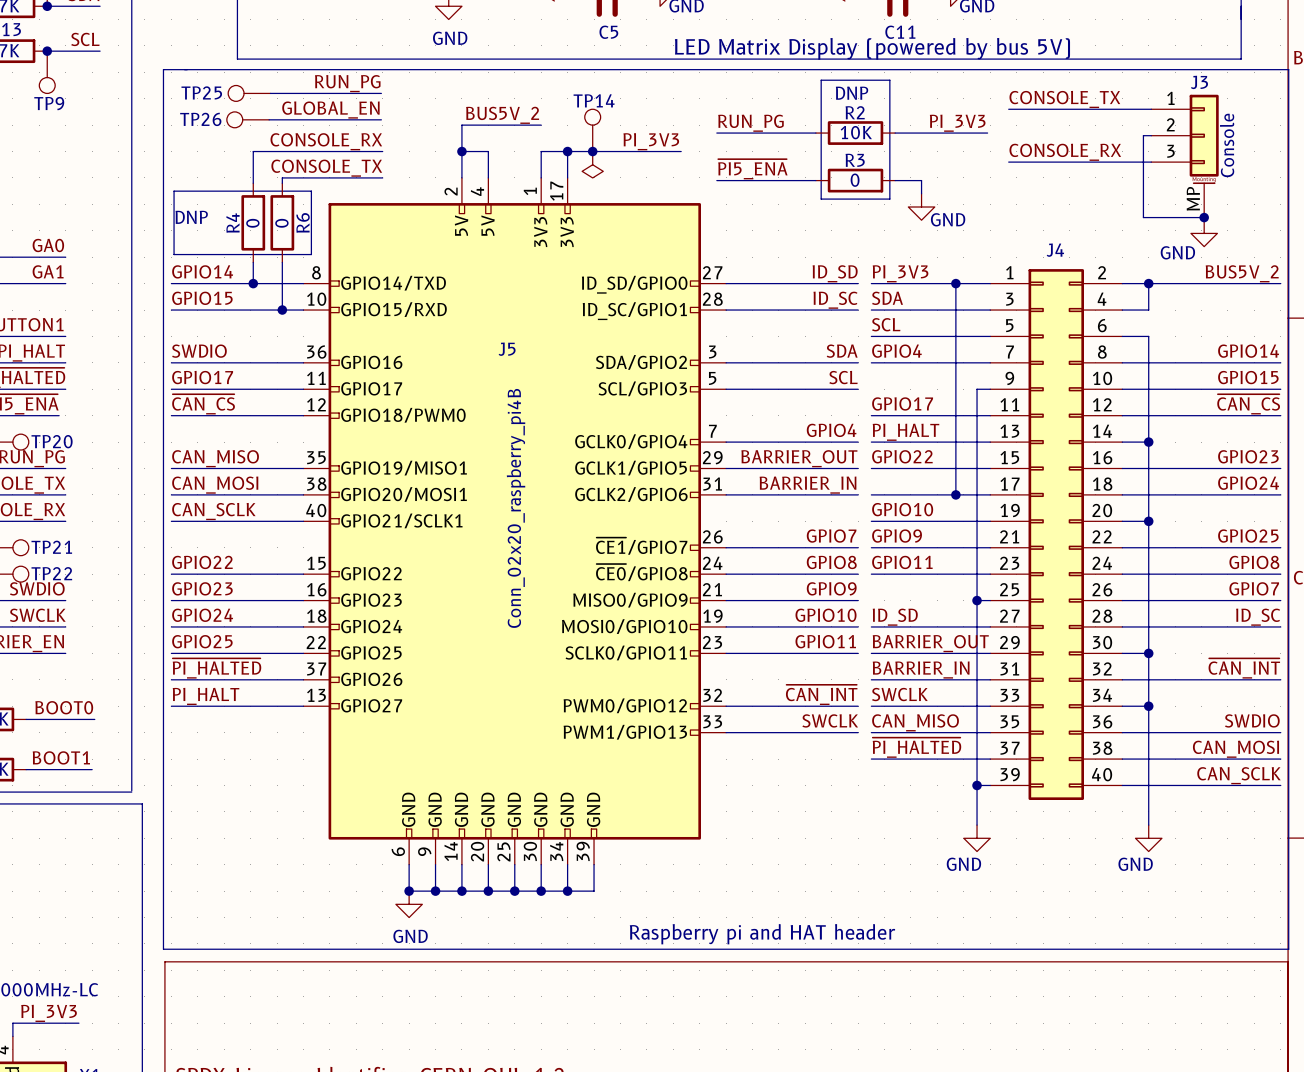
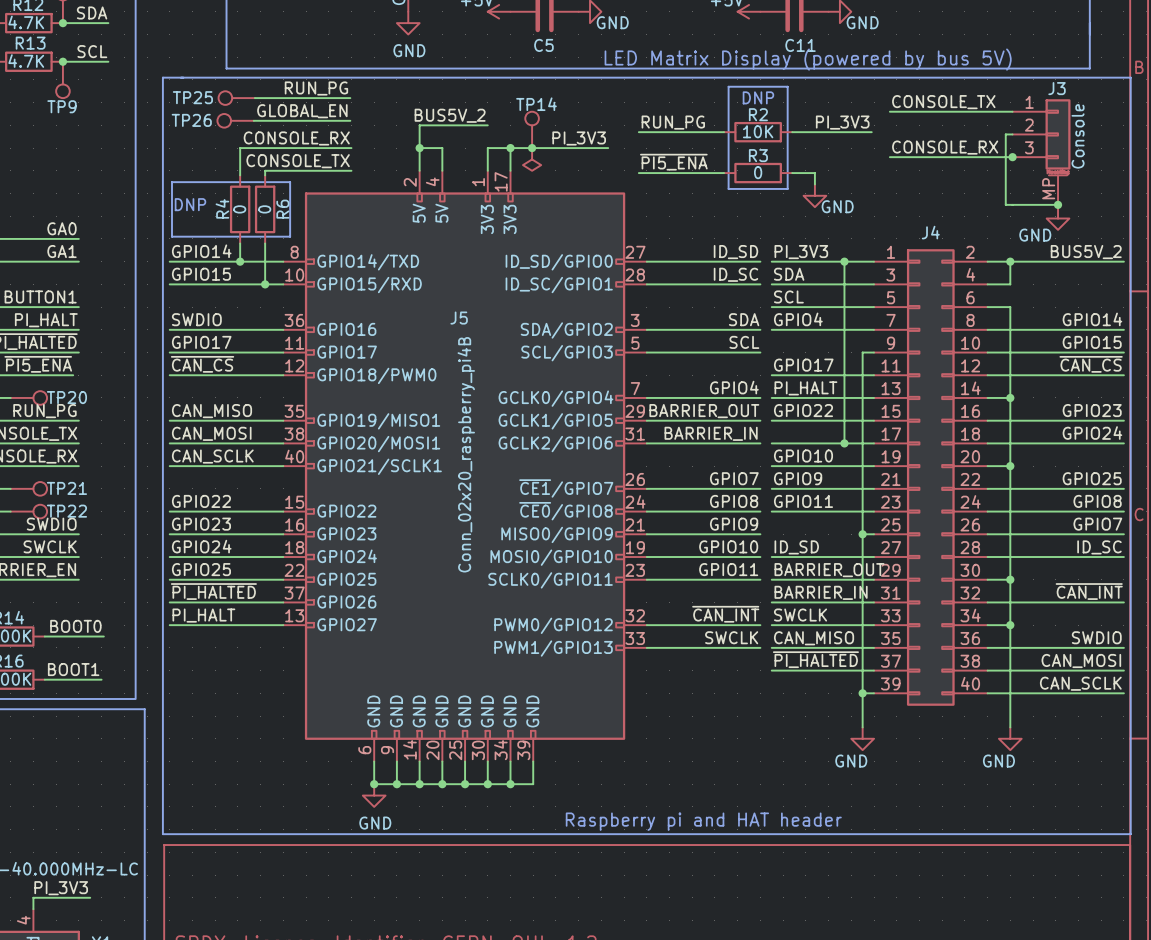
junction: none -> (1012, 157)

